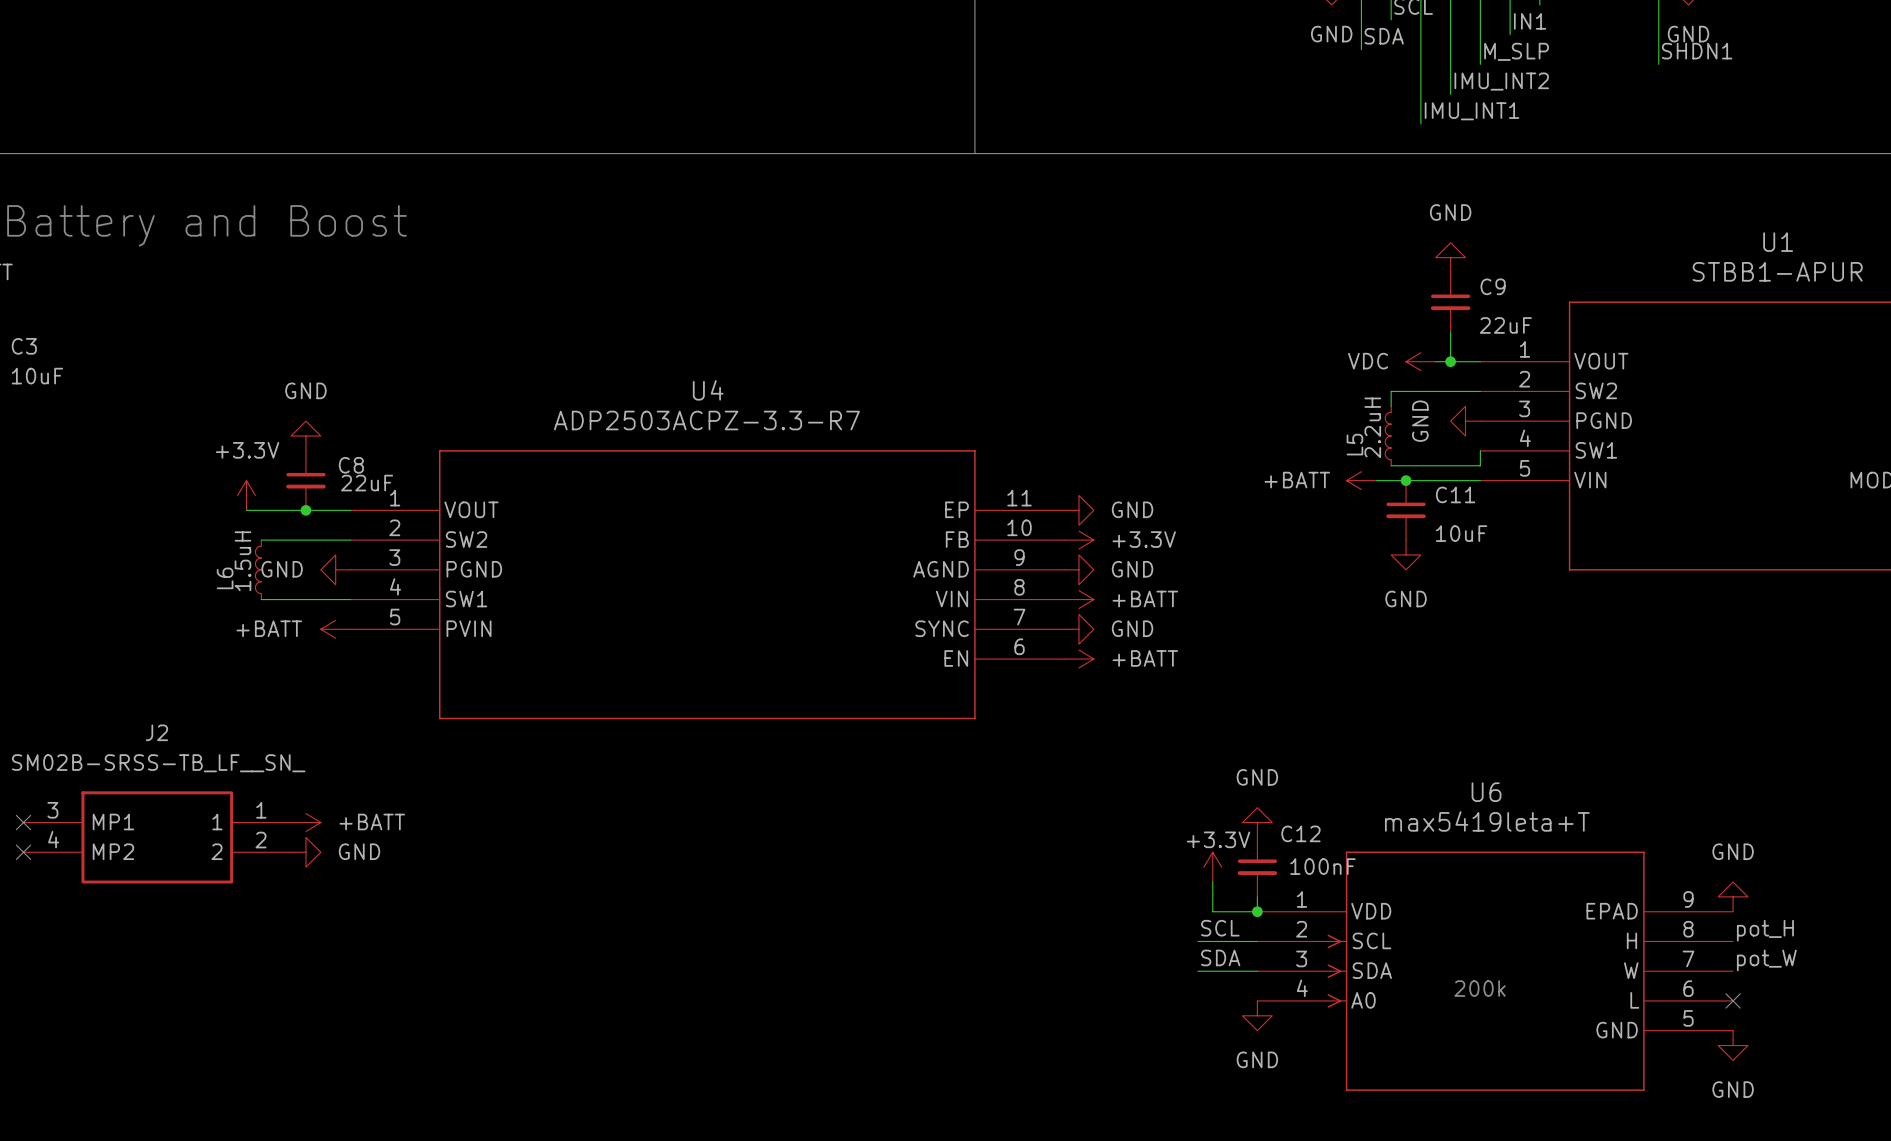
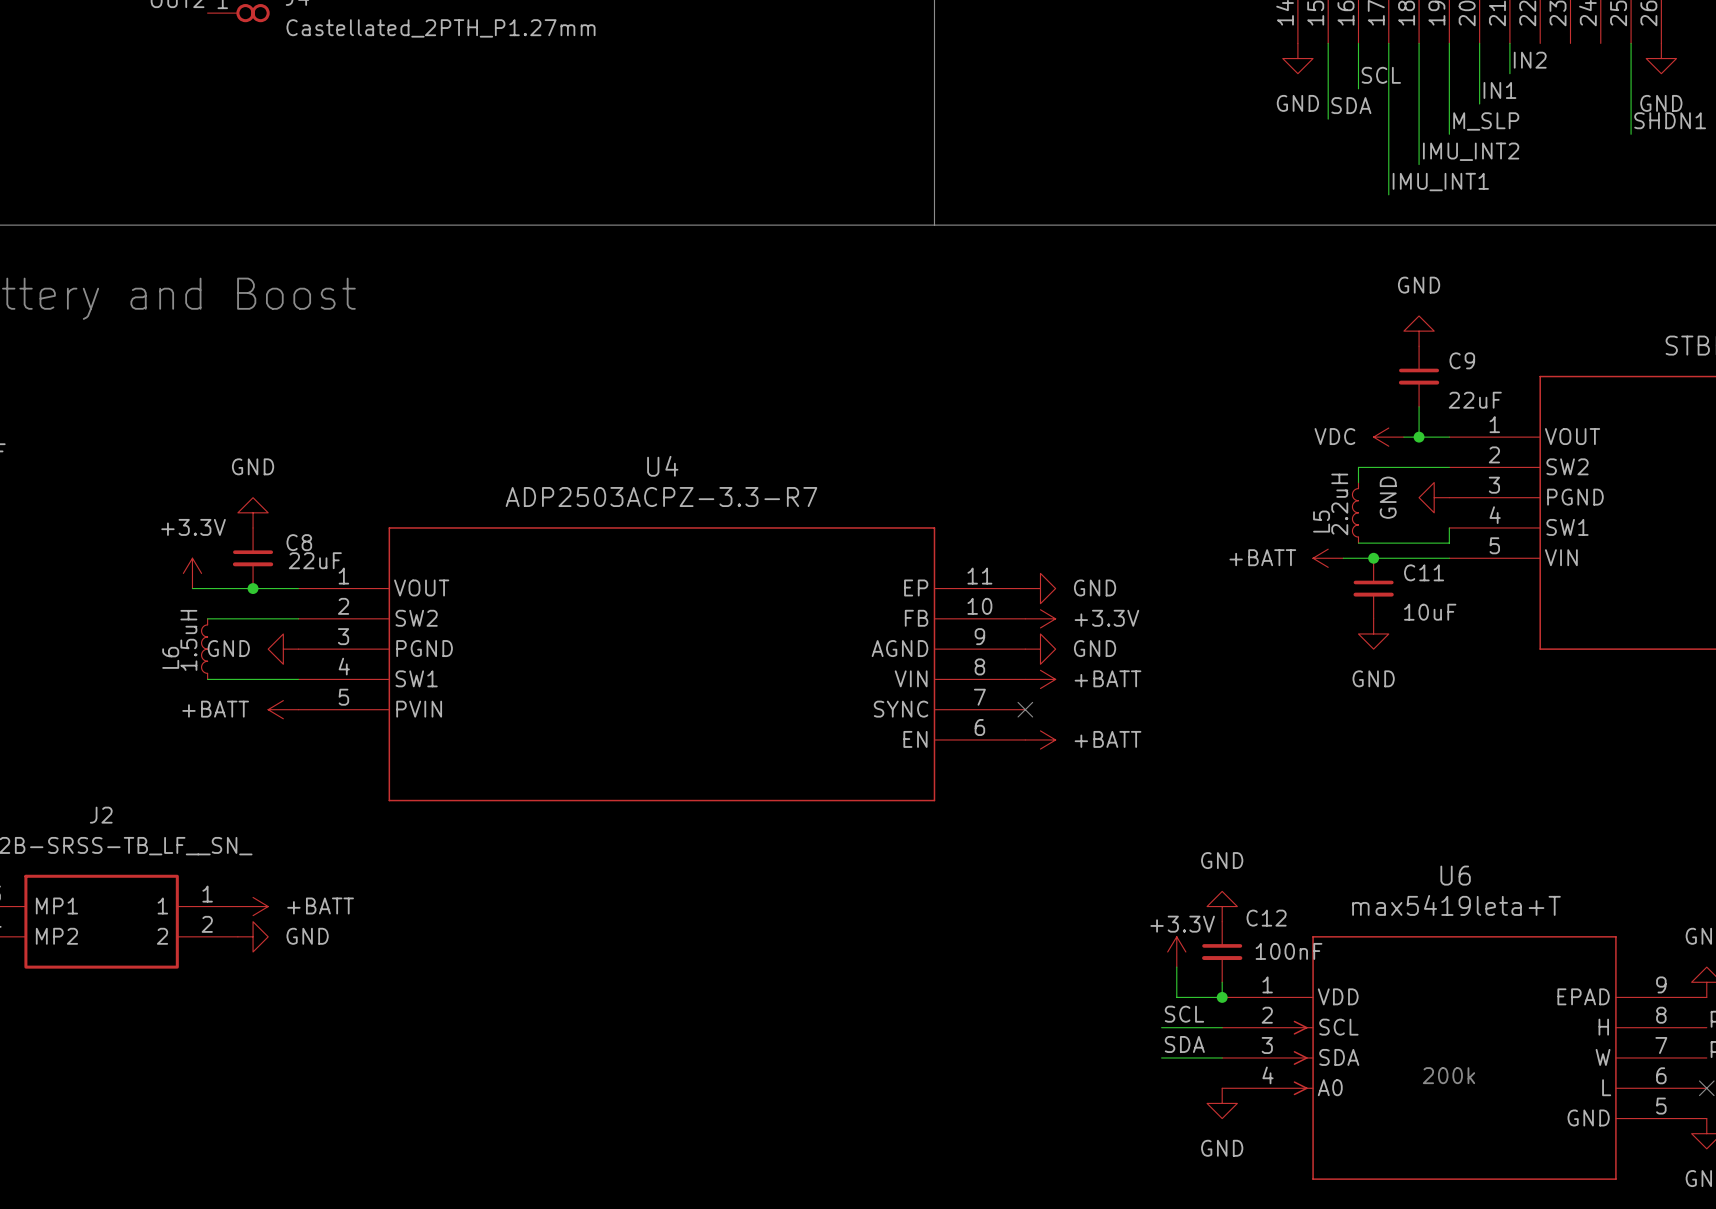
no-connect mark: none -> (1025, 709)
power symbol: GND (1078, 629) -> none

